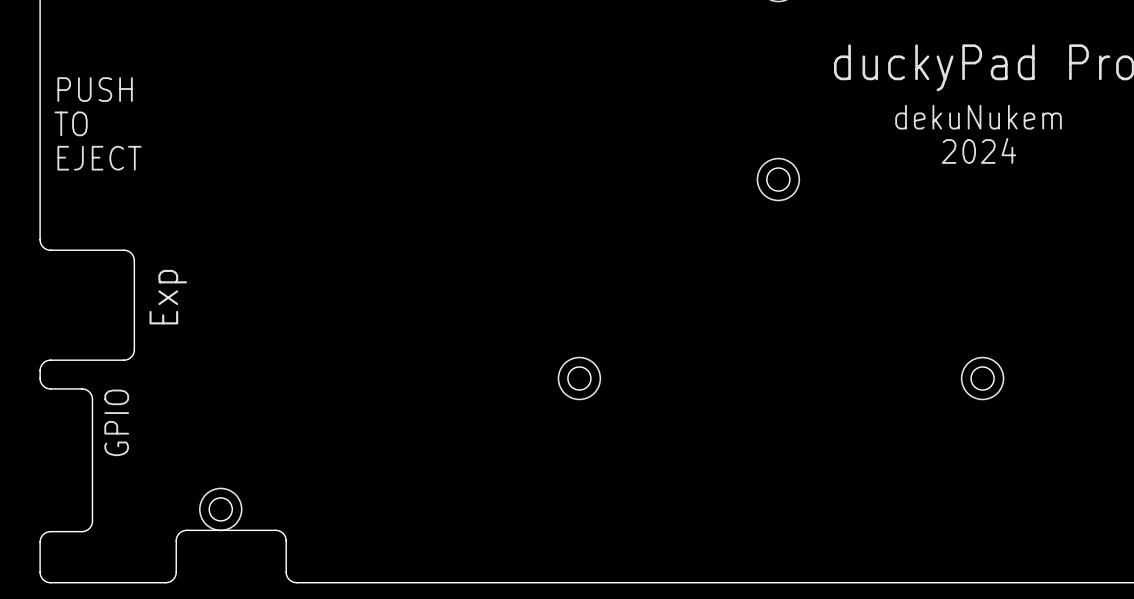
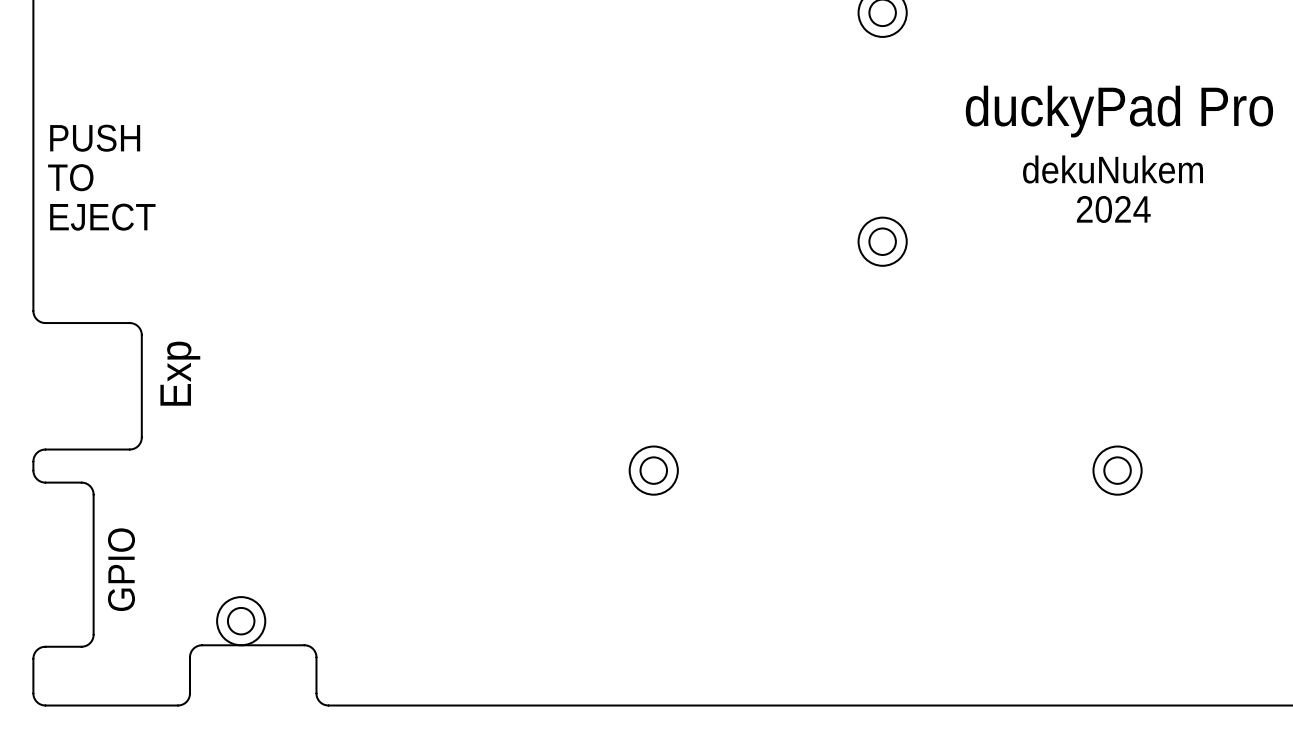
text position: GPIO (116, 422) -> GPIO (121, 569)

